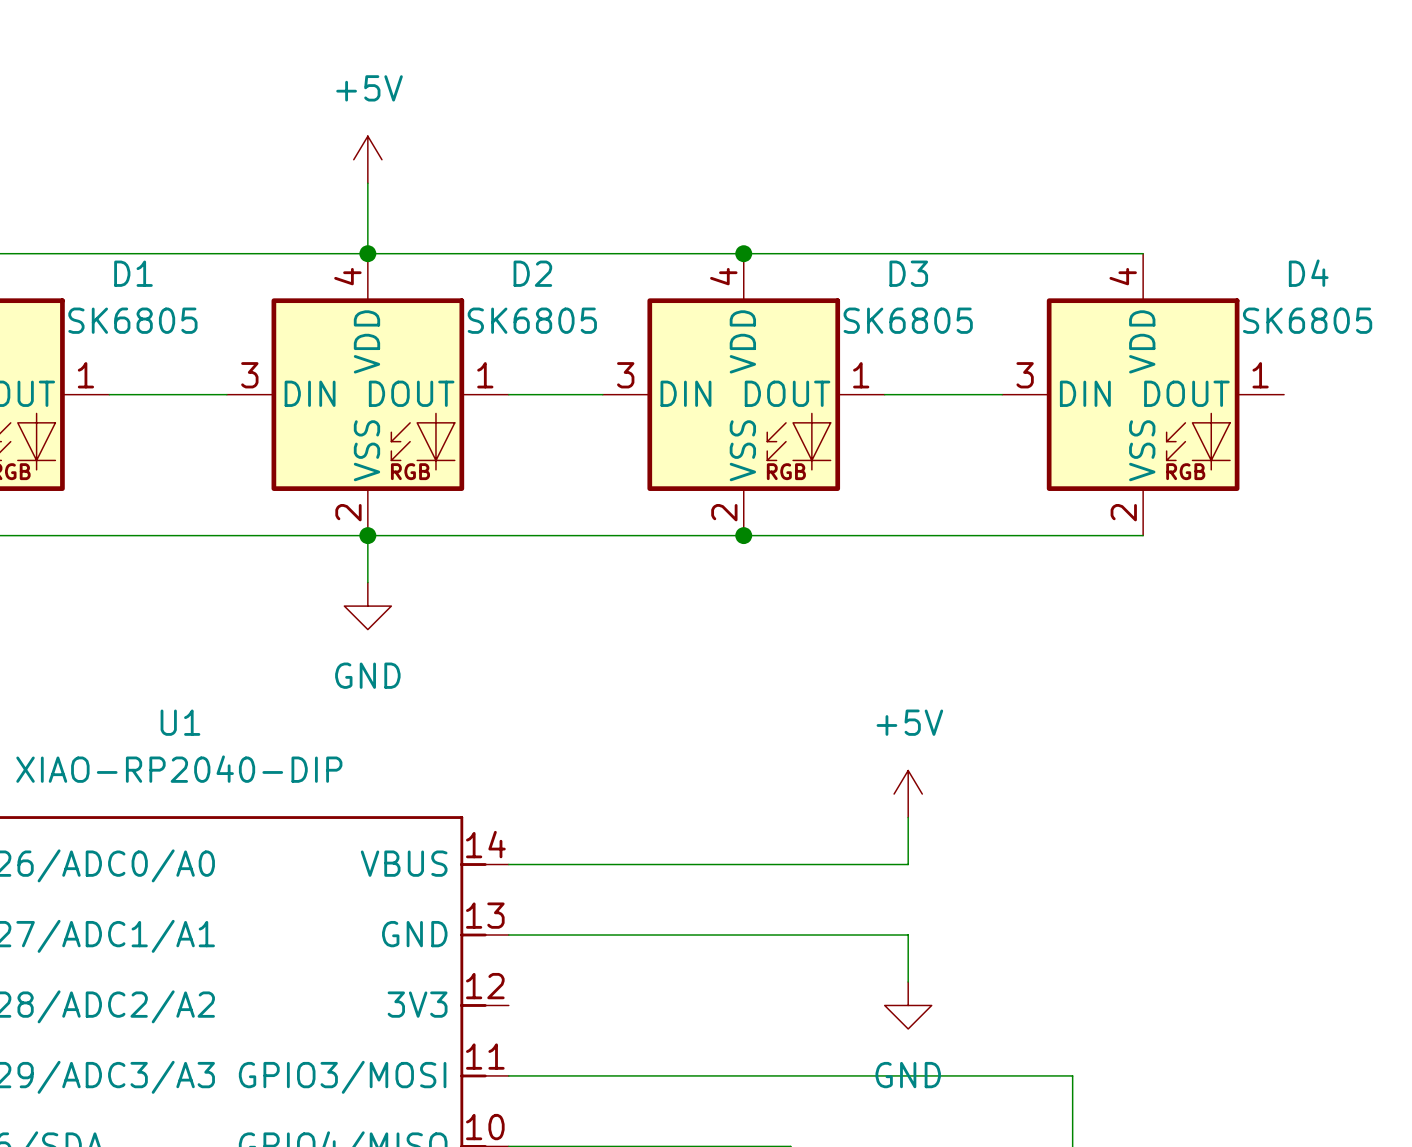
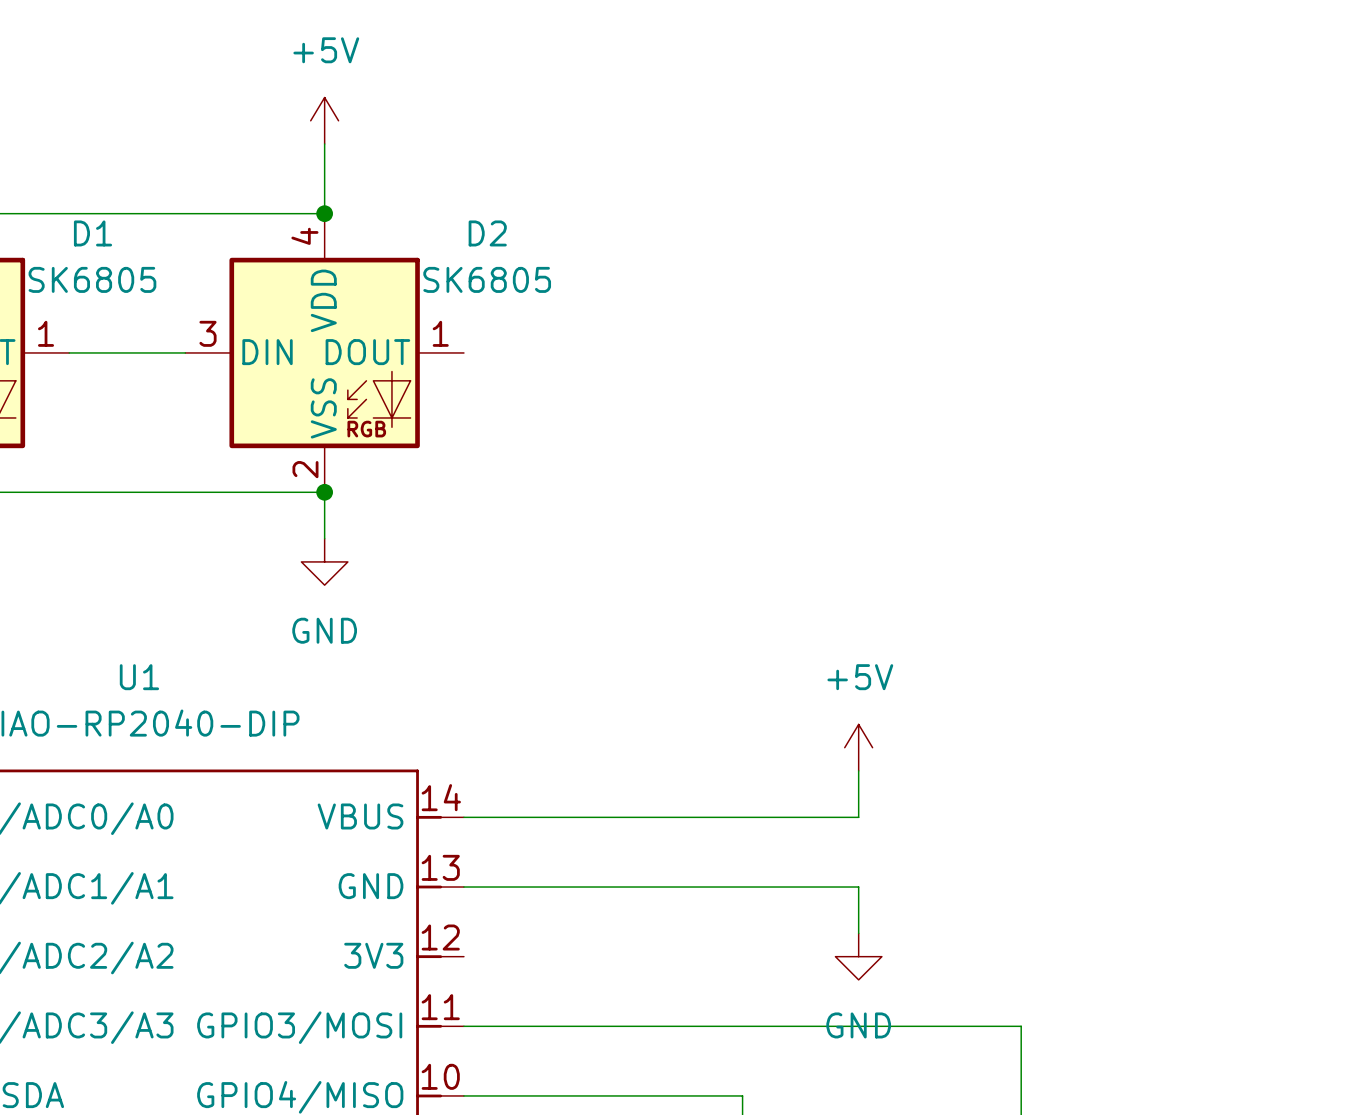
wire: (367, 253) (1143, 253) -> none
junction: (743, 253) -> none
wire: (508, 394) (602, 394) -> none
D3: SK6805 (743, 394) -> none
wire: (884, 394) (1002, 394) -> none
D4: SK6805 (1143, 394) -> none
wire: (367, 535) (1143, 535) -> none
junction: (743, 535) -> none

